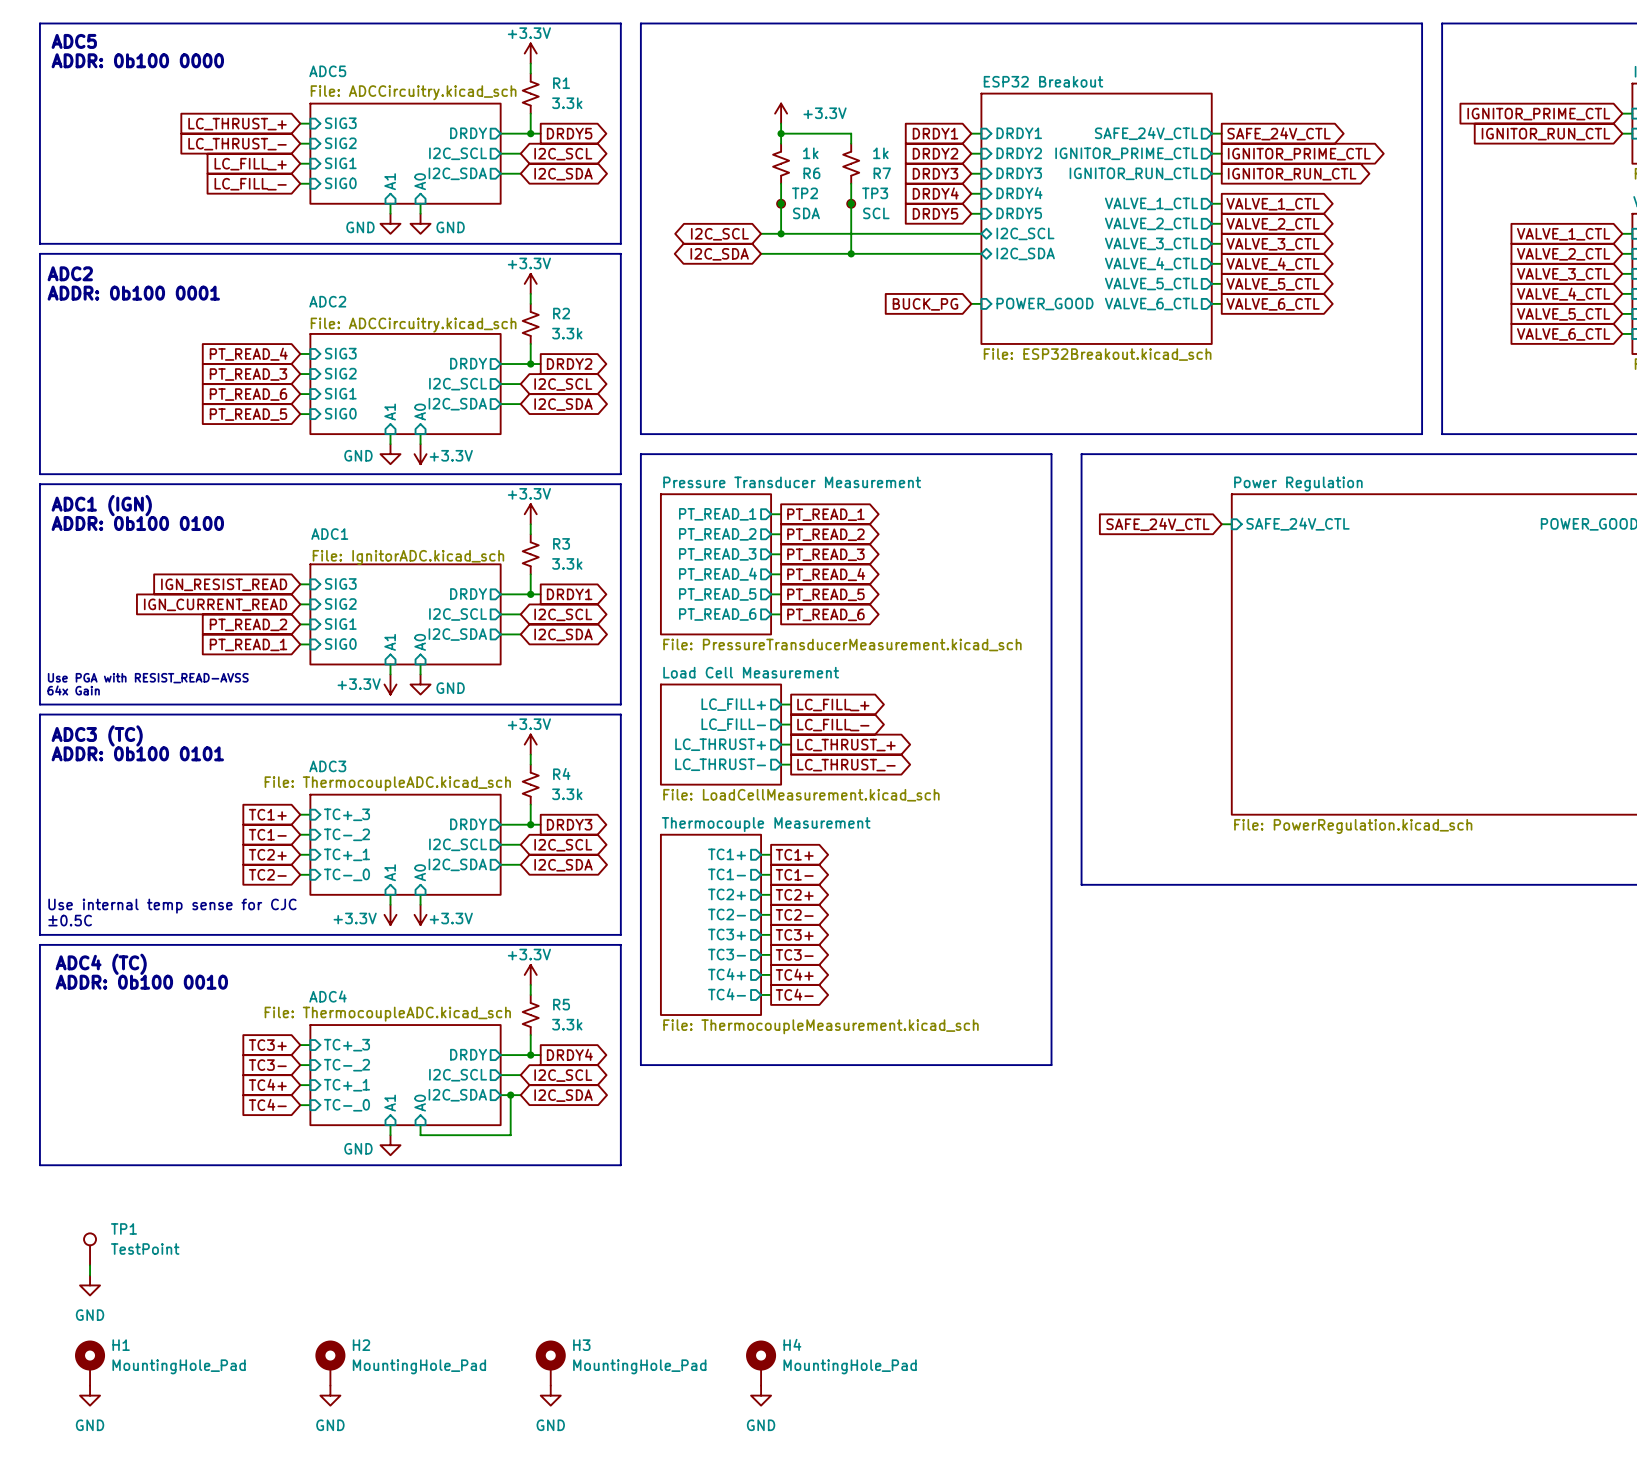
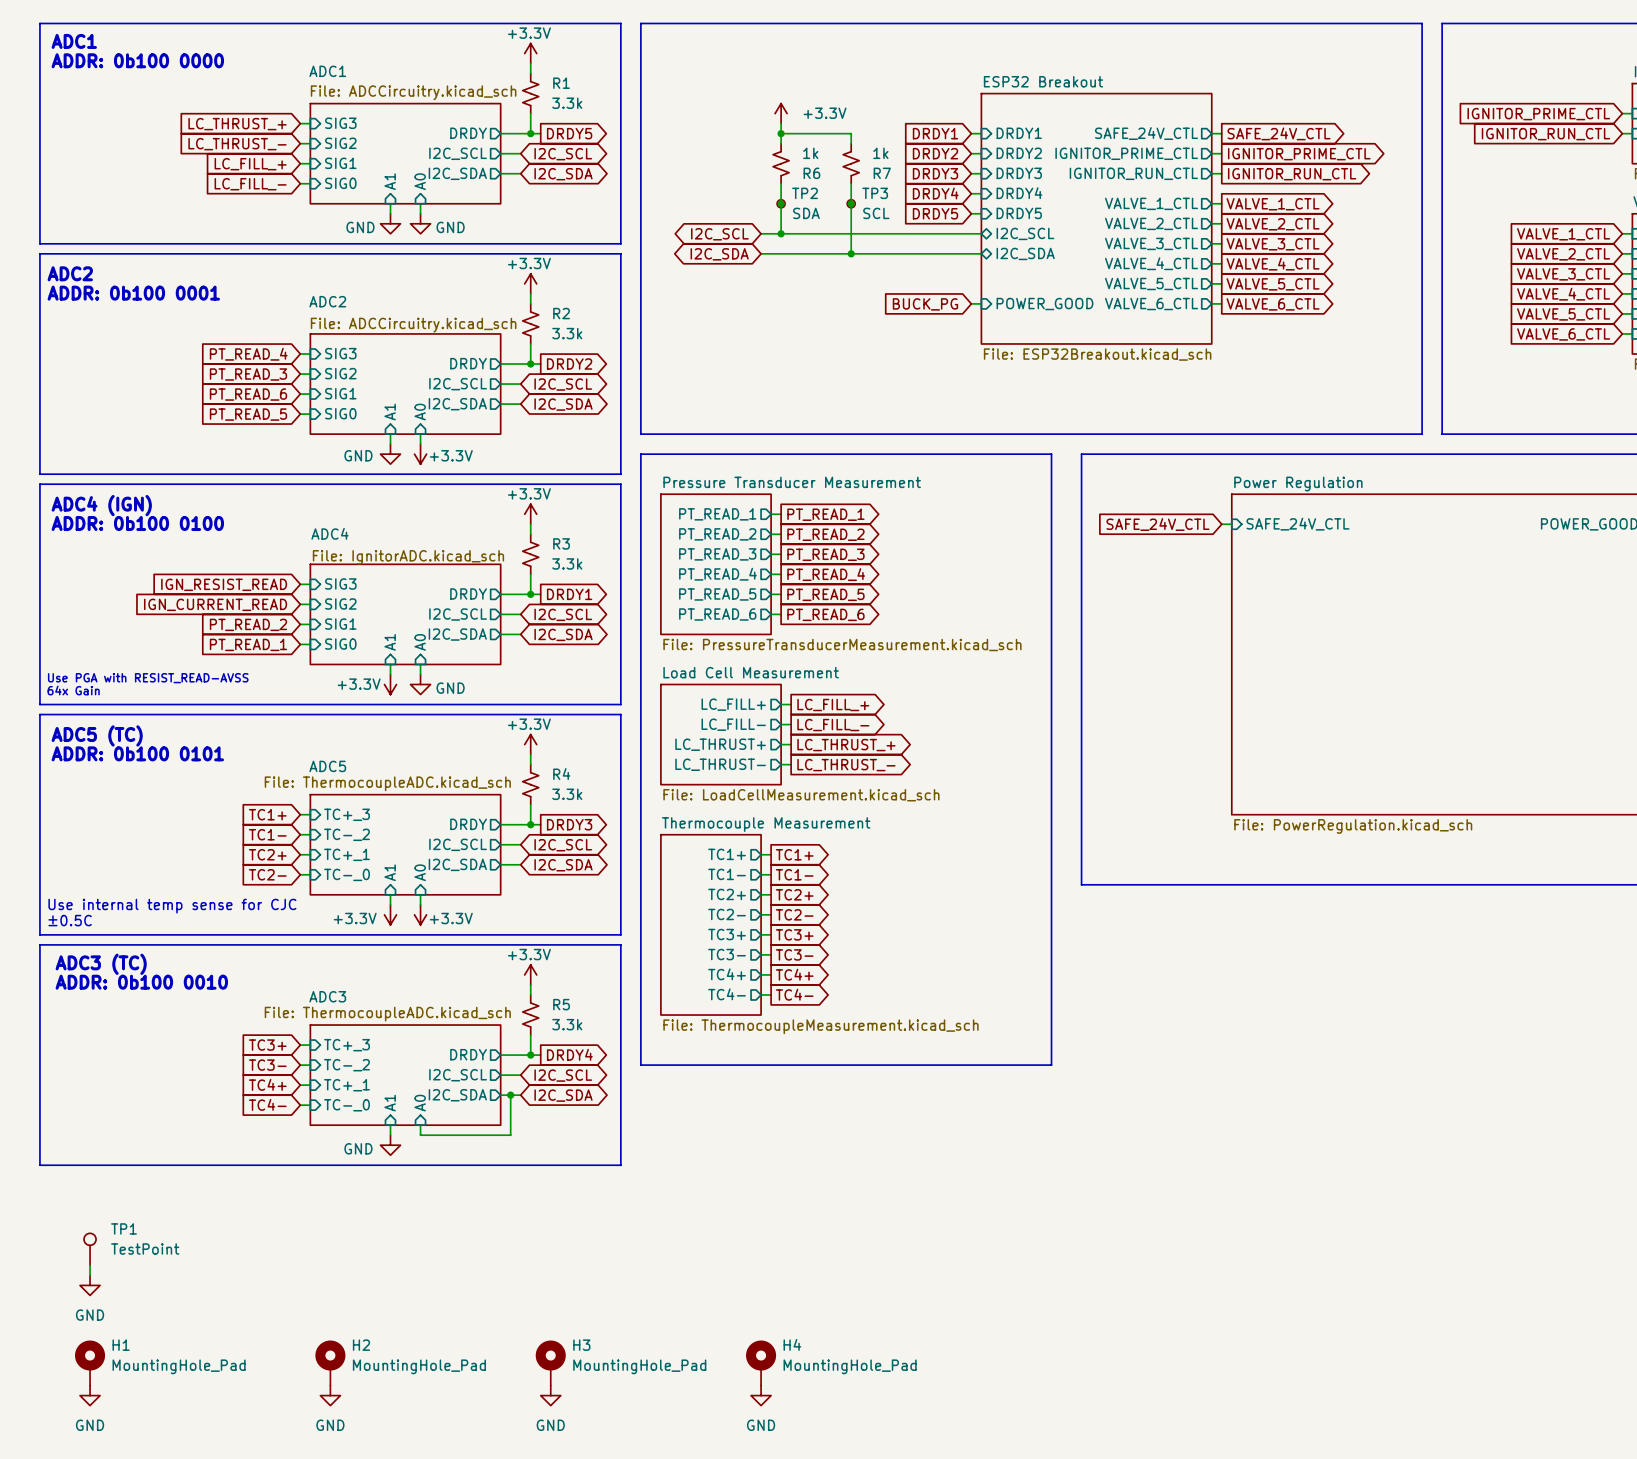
text: ADC5 (74, 41) -> ADC1 (74, 41)
sheet ADC5 name: ADC5 (327, 71) -> ADC1 (327, 71)
text: ADC1 (IGN) (101, 505) -> ADC4 (IGN) (101, 505)
sheet ADC1 name: ADC1 (329, 534) -> ADC4 (330, 533)
text: ADC3 (TC) (97, 735) -> ADC5 (TC) (97, 735)
sheet ADC3 name: ADC3 (327, 766) -> ADC5 (327, 766)
text: ADC4 (TC) (101, 964) -> ADC3 (TC) (101, 964)
sheet ADC4 name: ADC4 (328, 996) -> ADC3 (327, 996)

